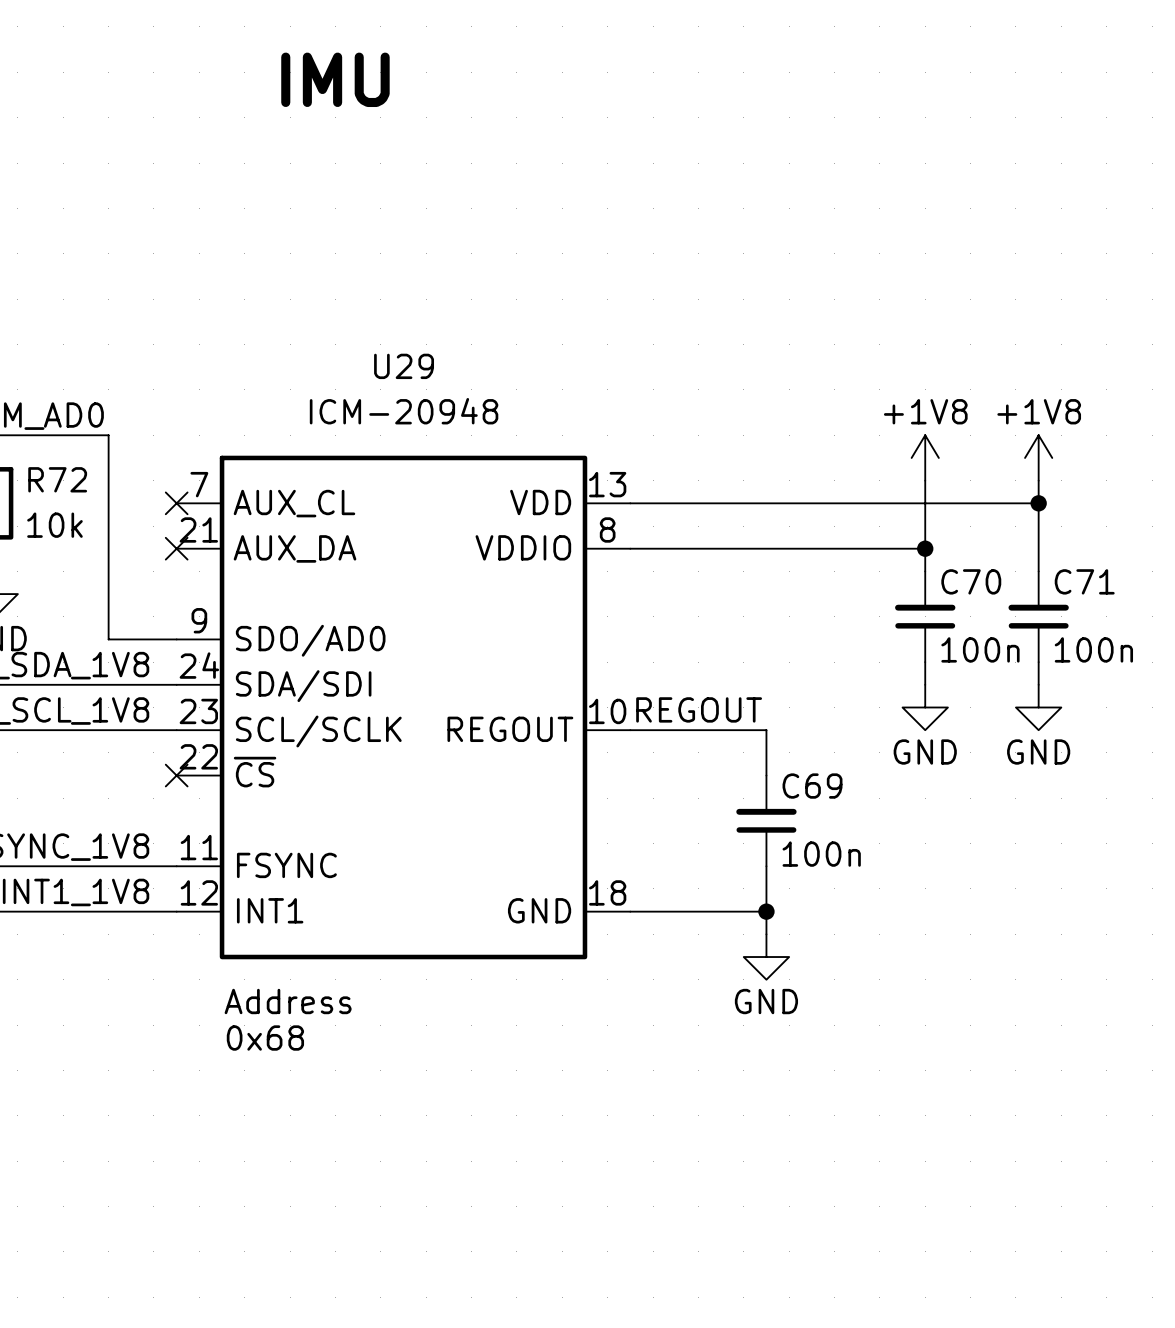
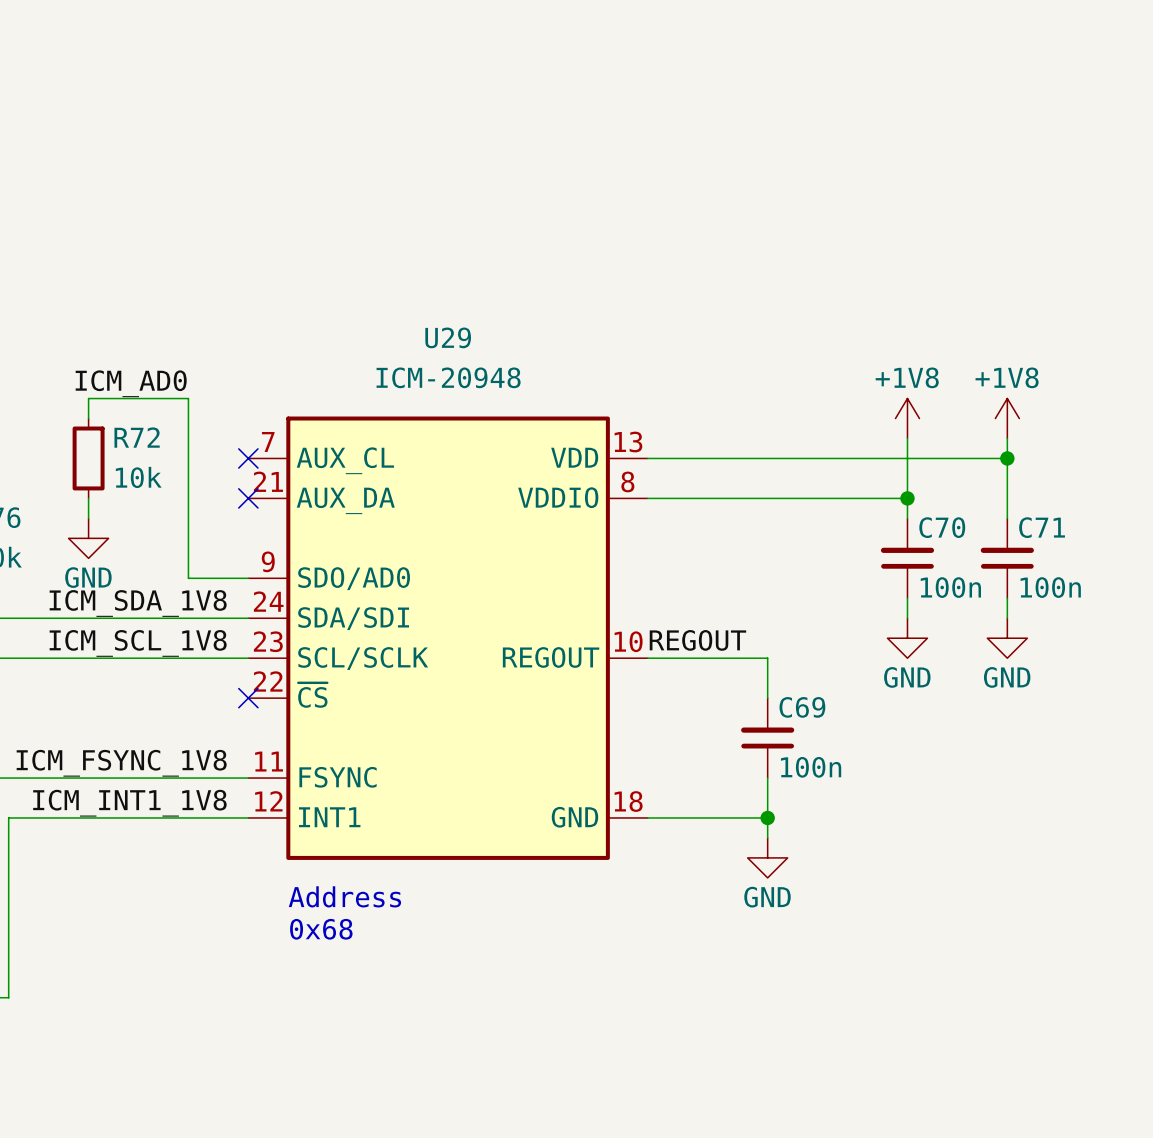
text: IMU (335, 79) -> none

